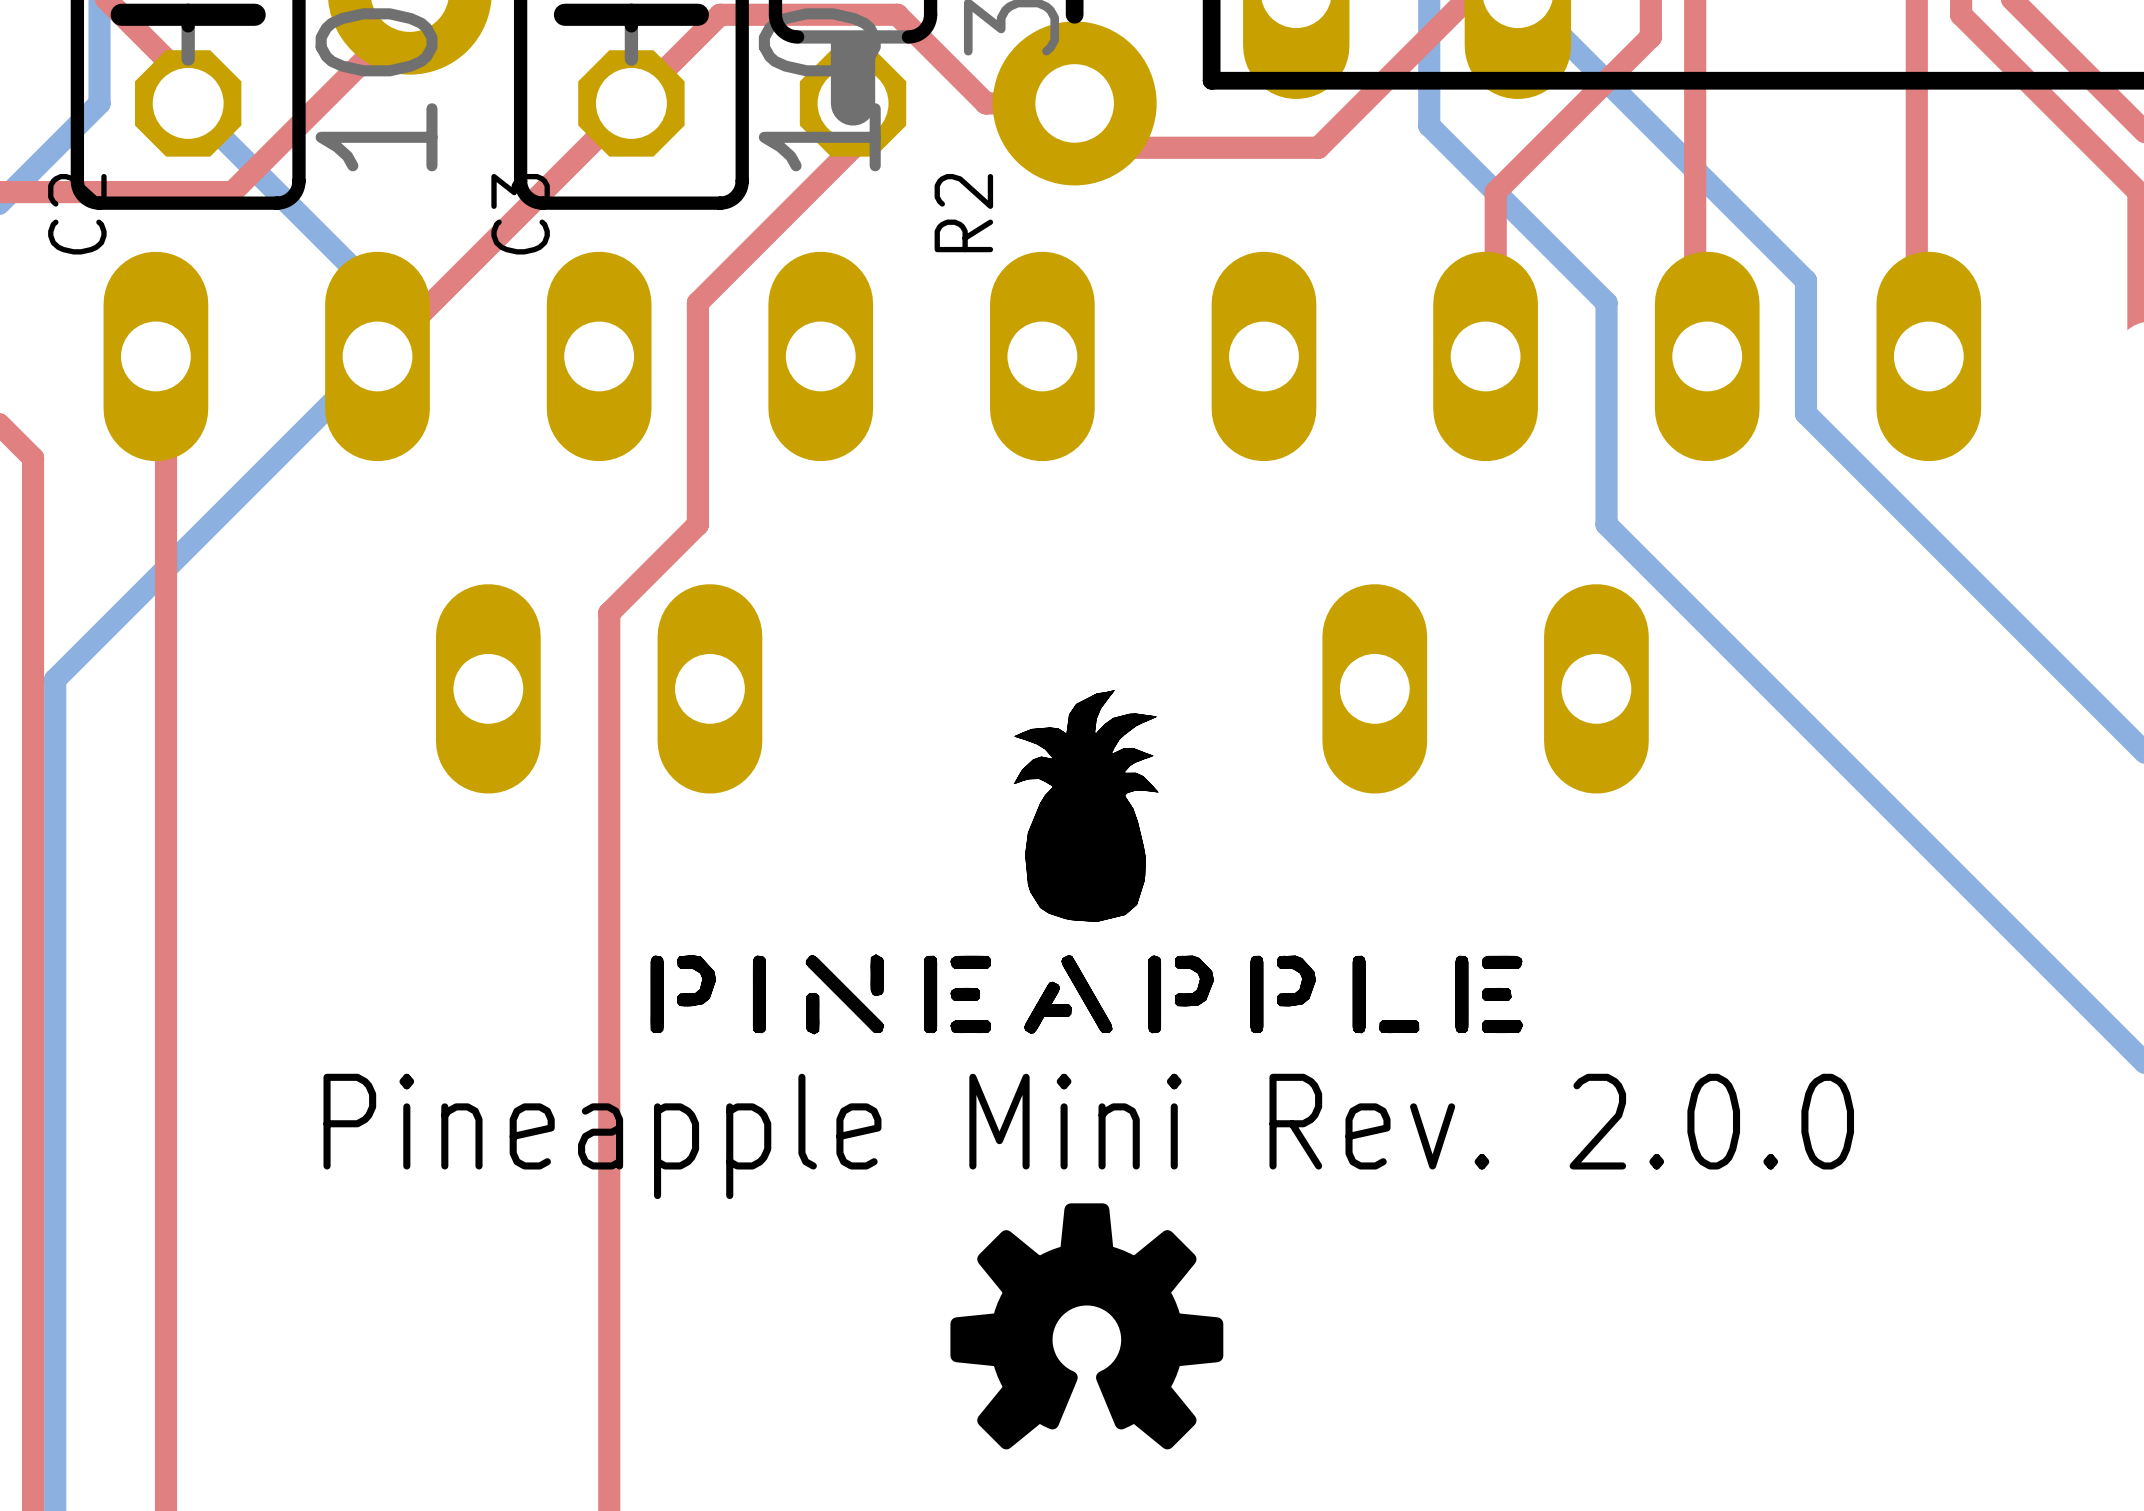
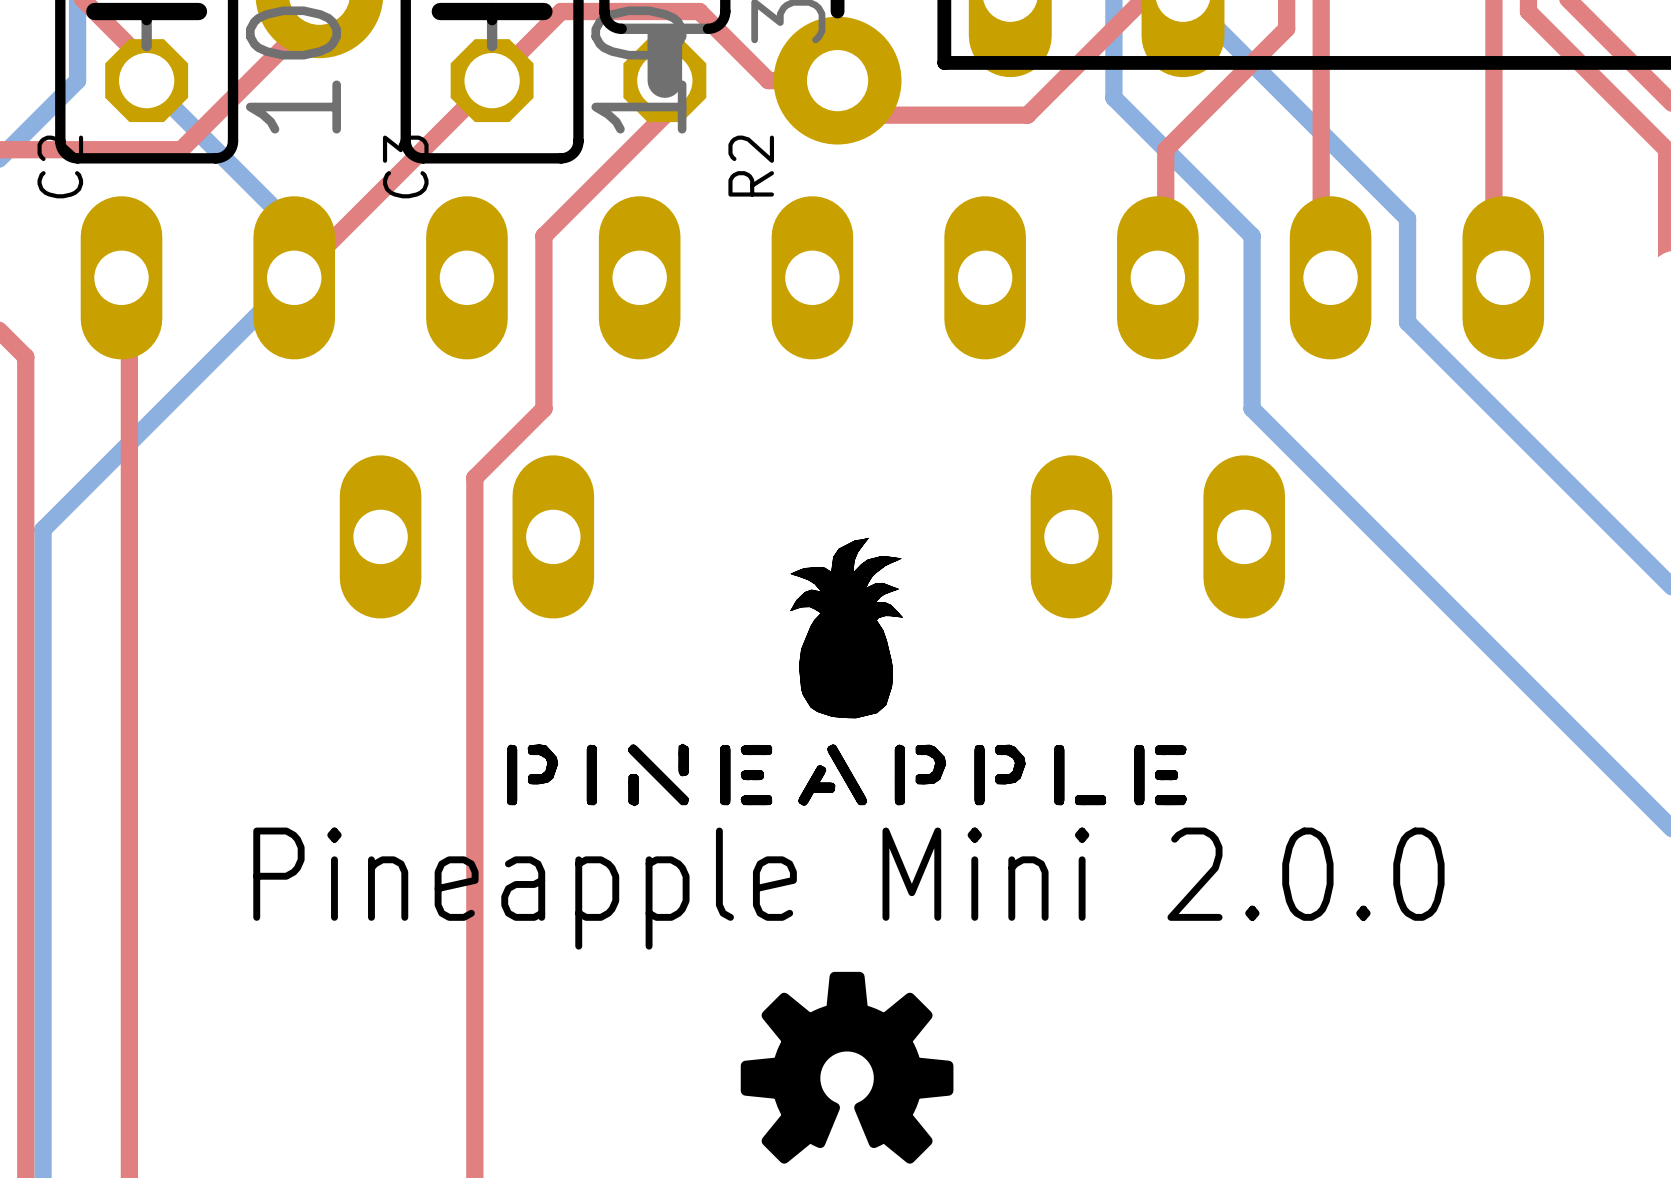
text: Pineapple Mini Rev. 2.0.0 (1088, 1136) -> Pineapple Mini 2.0.0 (848, 888)
drawing position: (1086, 1326) -> (847, 1067)

